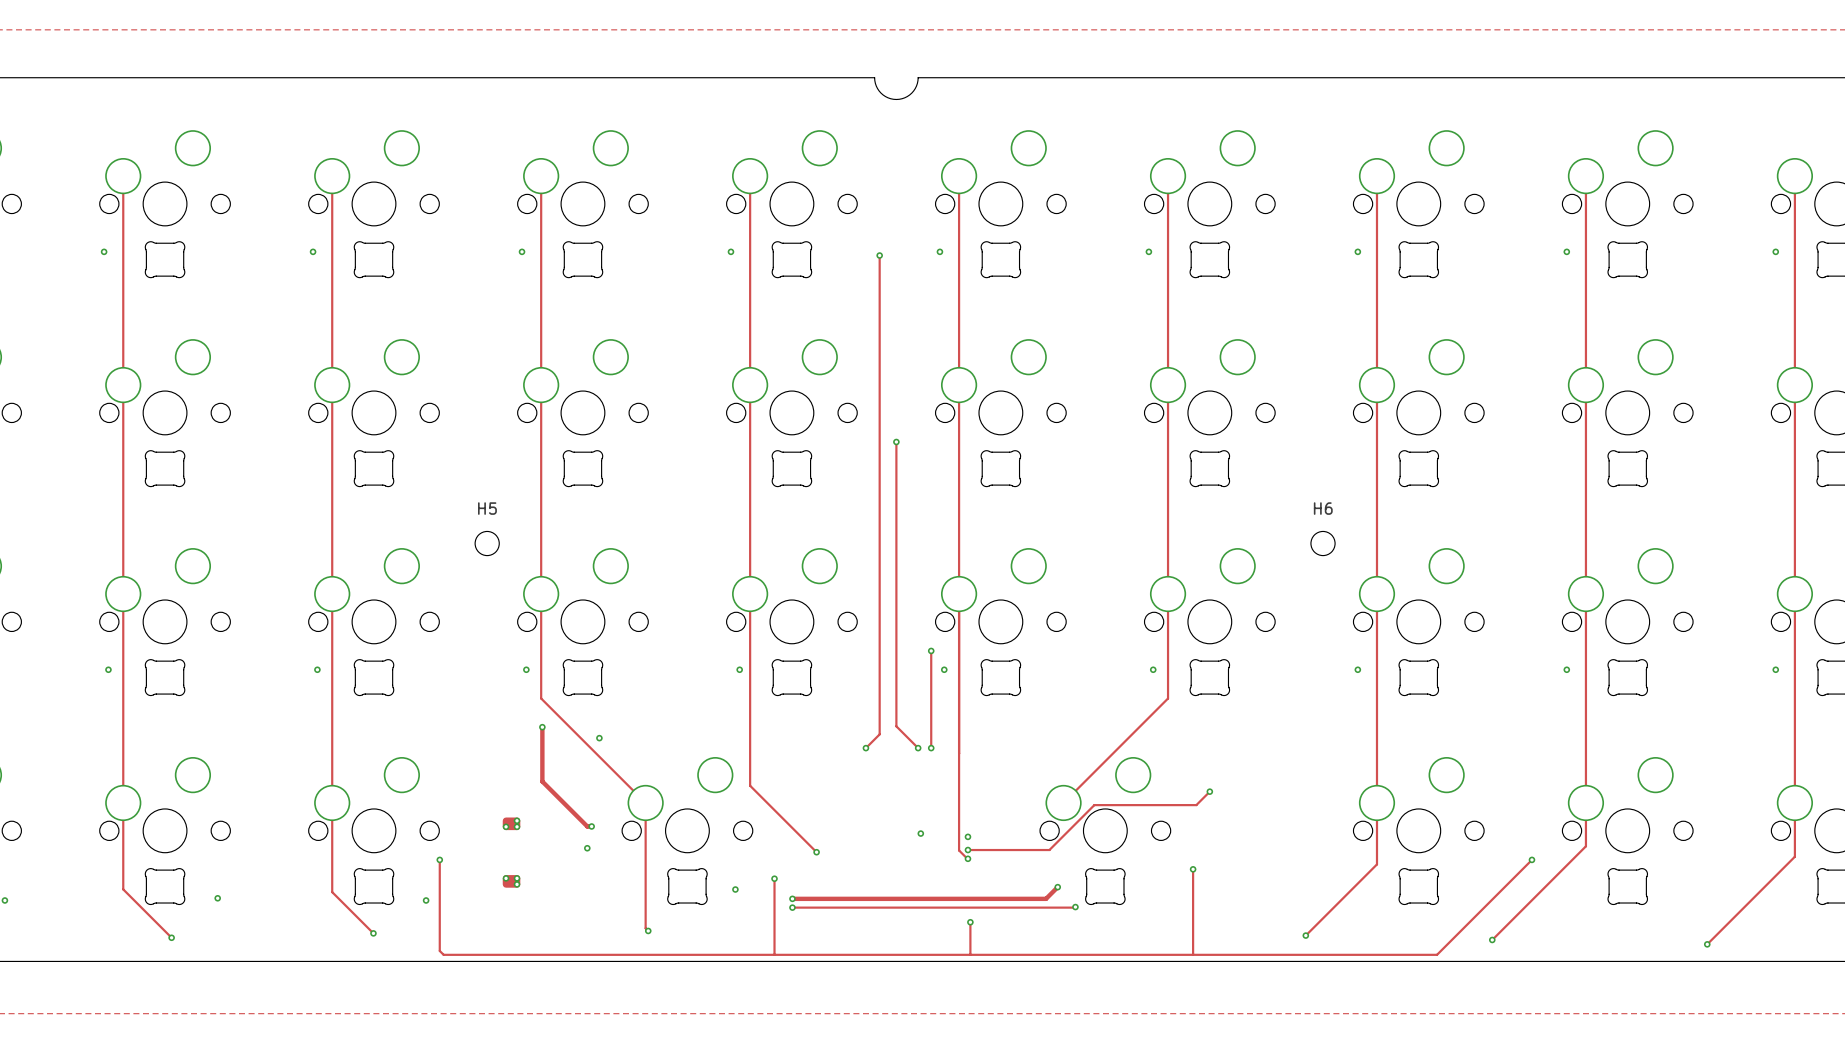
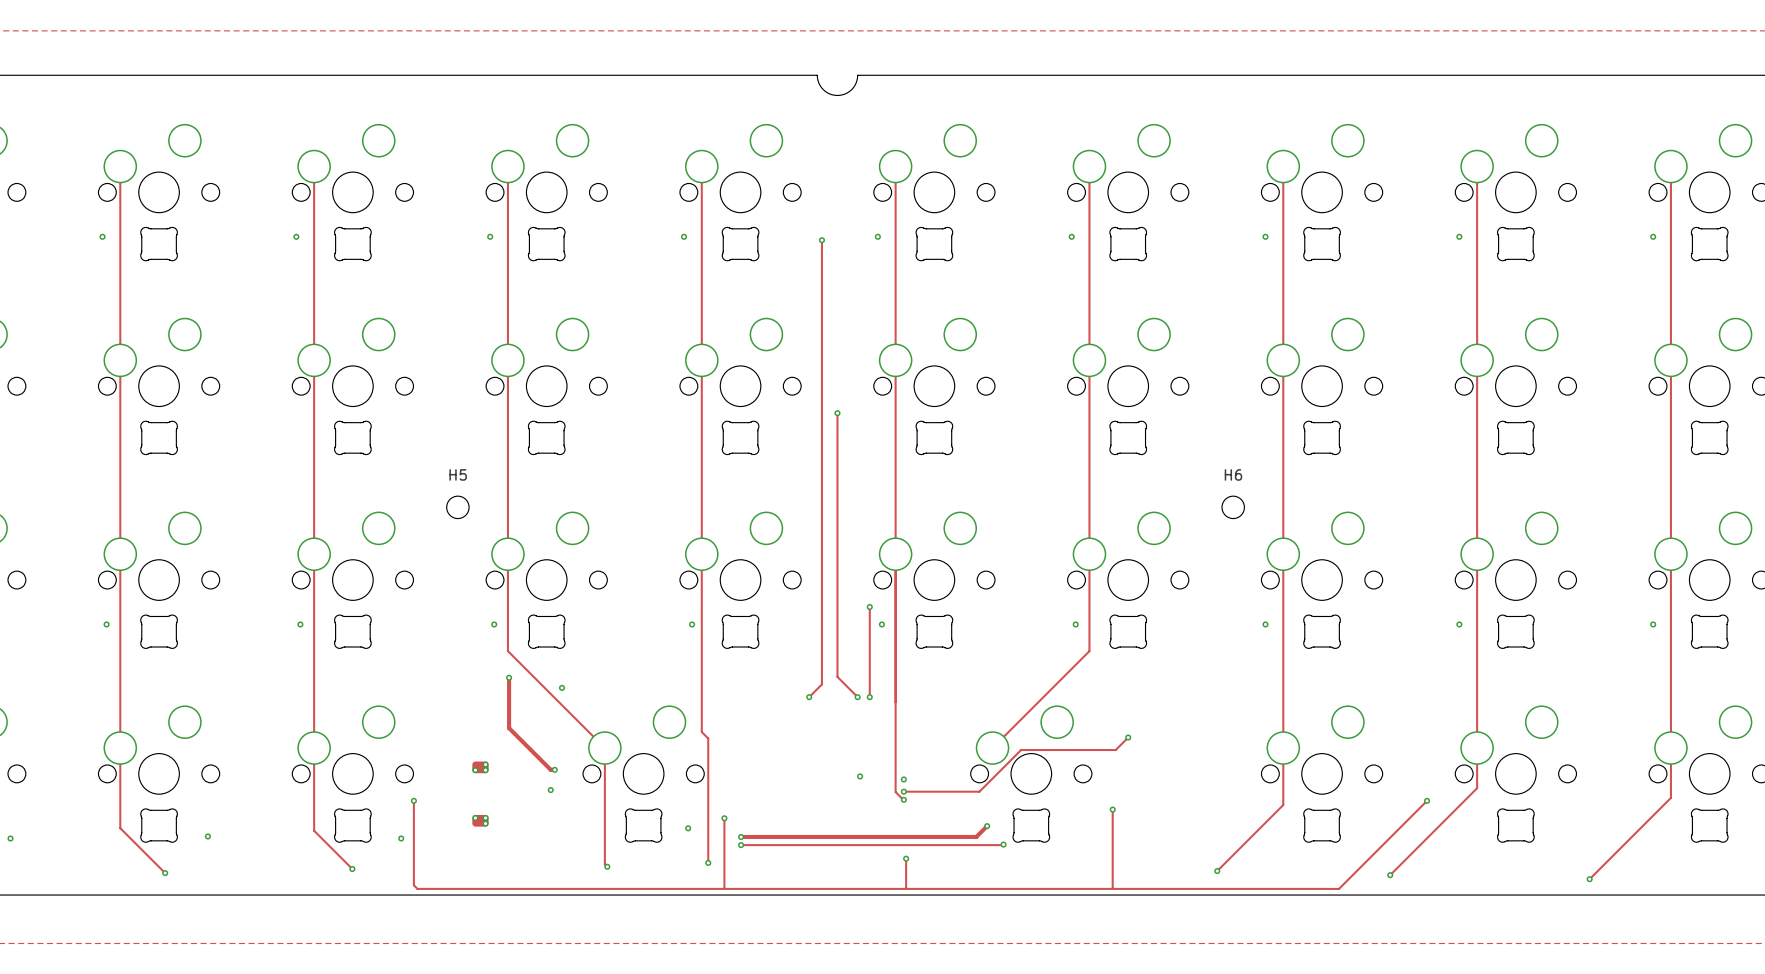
track: (757, 792) (816, 852) -> (708, 738) (708, 862)
via: (816, 852) -> none
via: none -> (708, 862)

